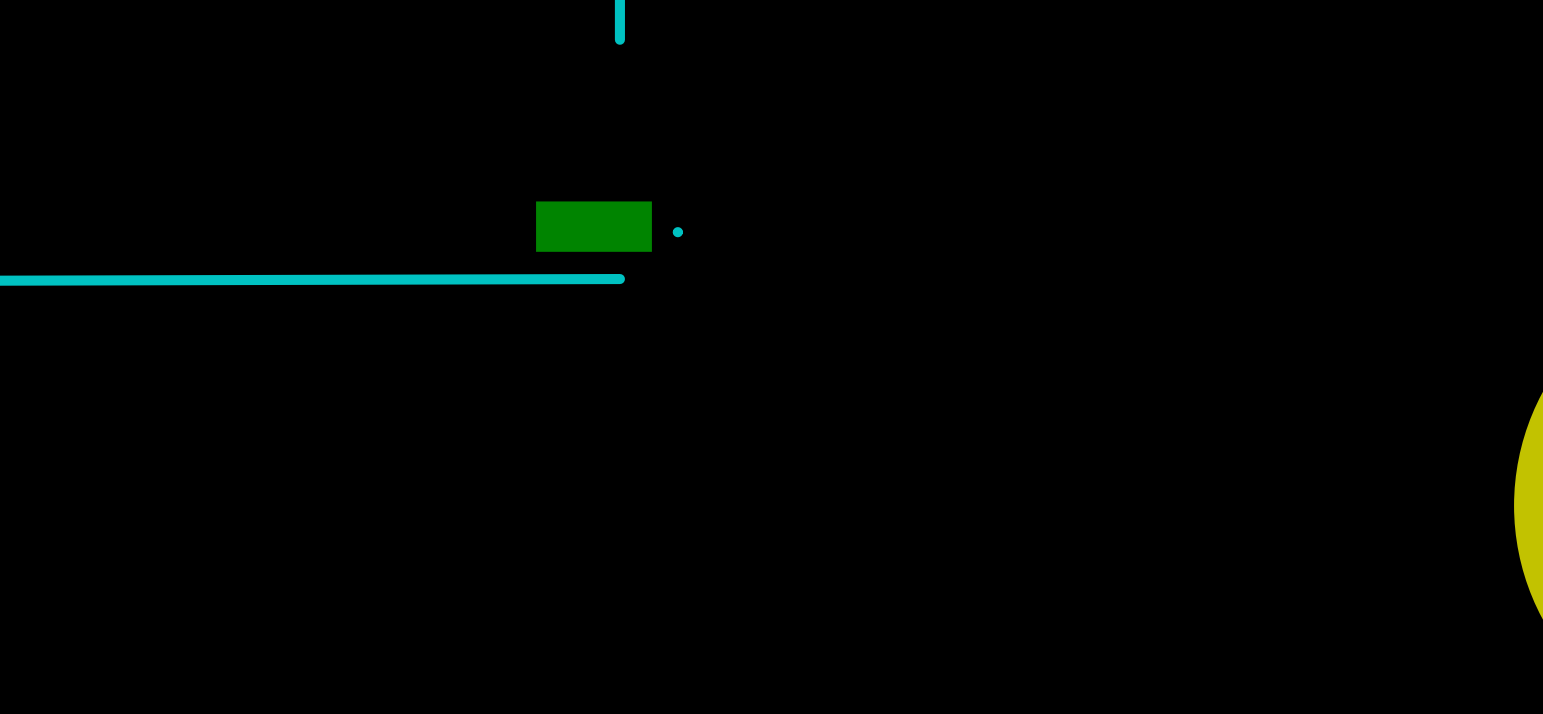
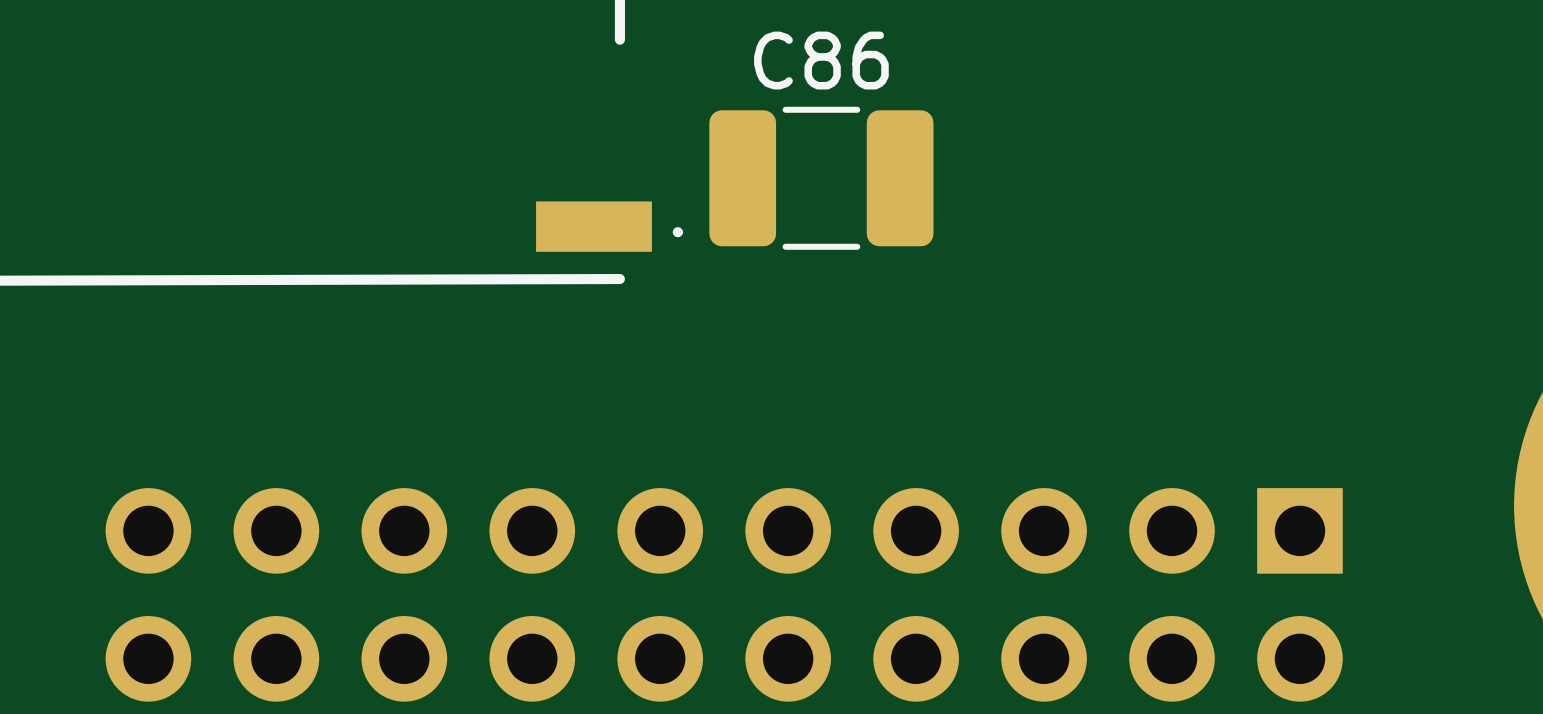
C86: none -> (821, 178)
part: none -> (724, 594)

